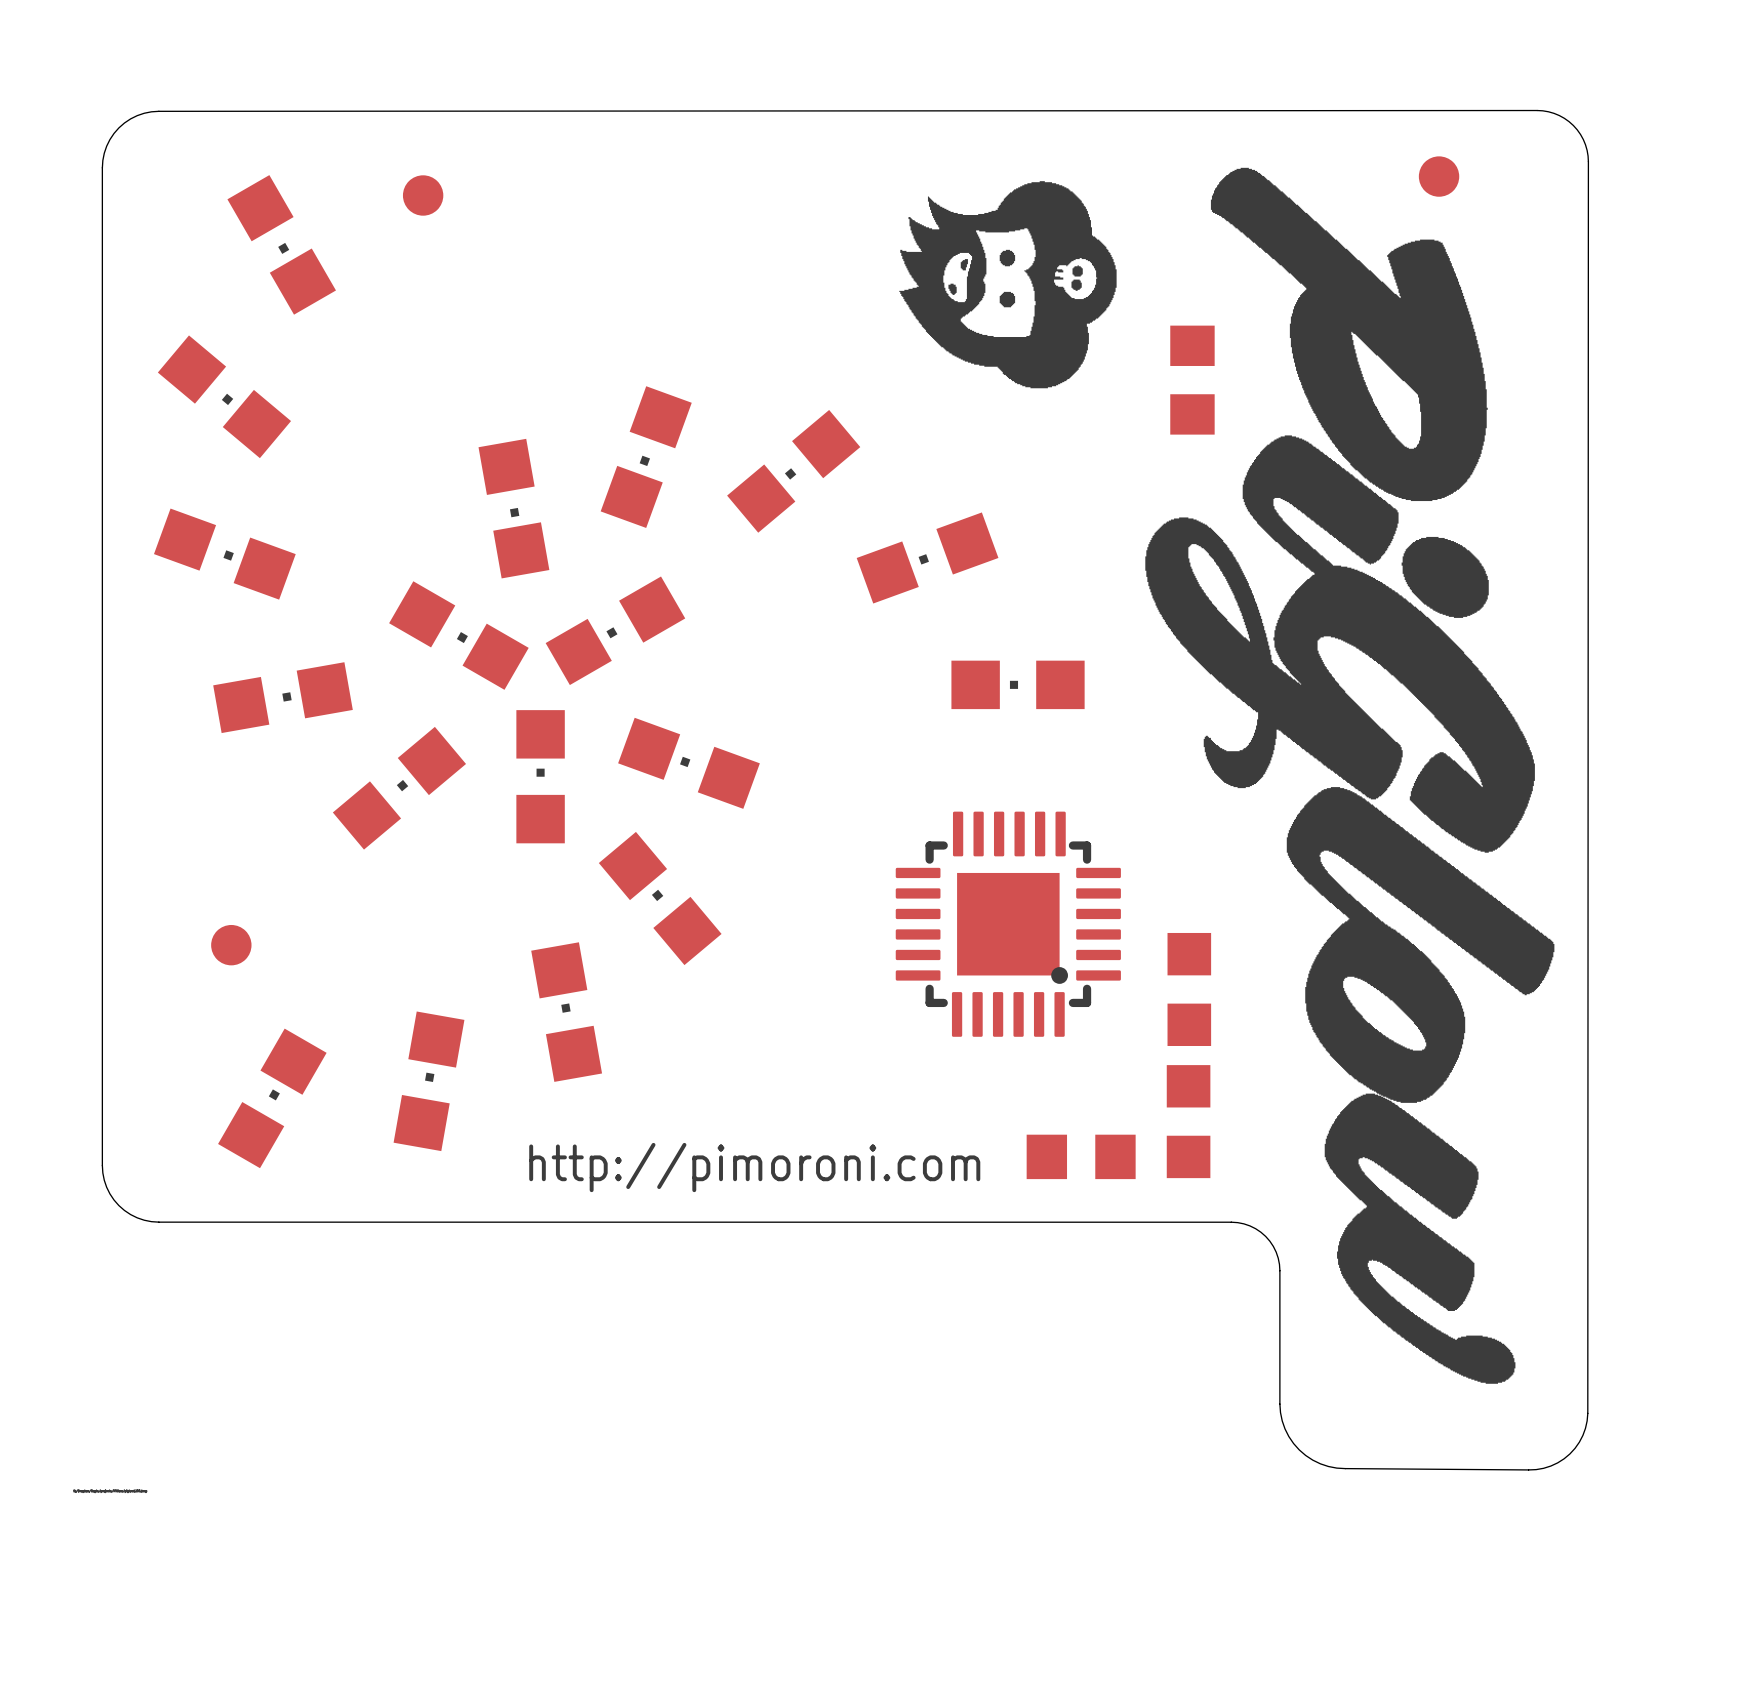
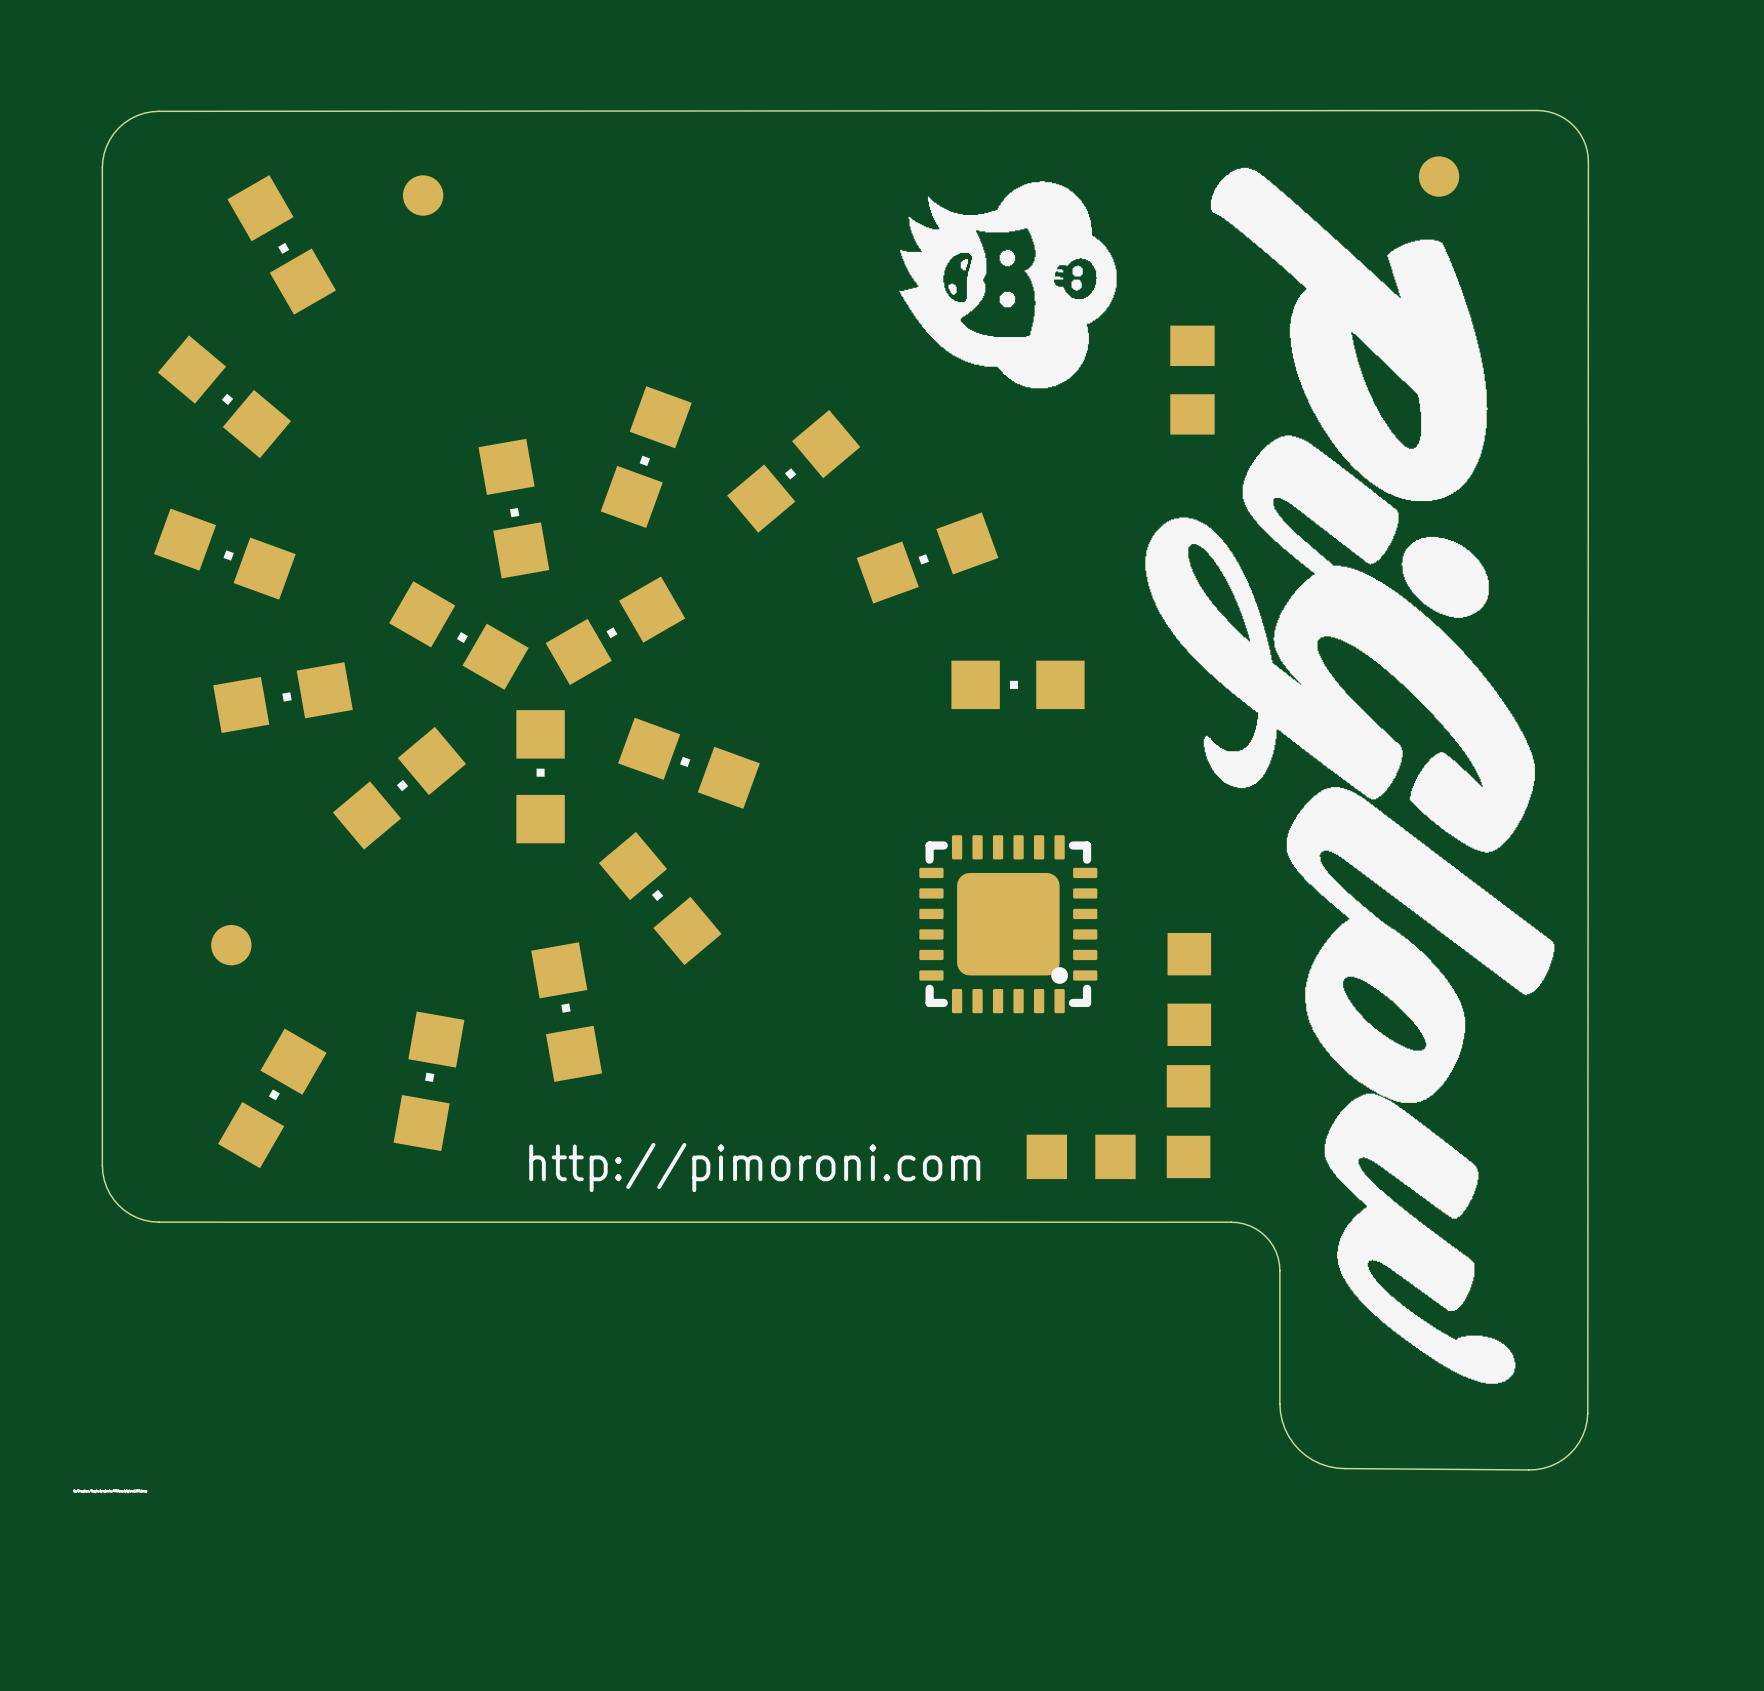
part footprint: [895, 811, 1121, 1037] -> [919, 835, 1098, 1014]

